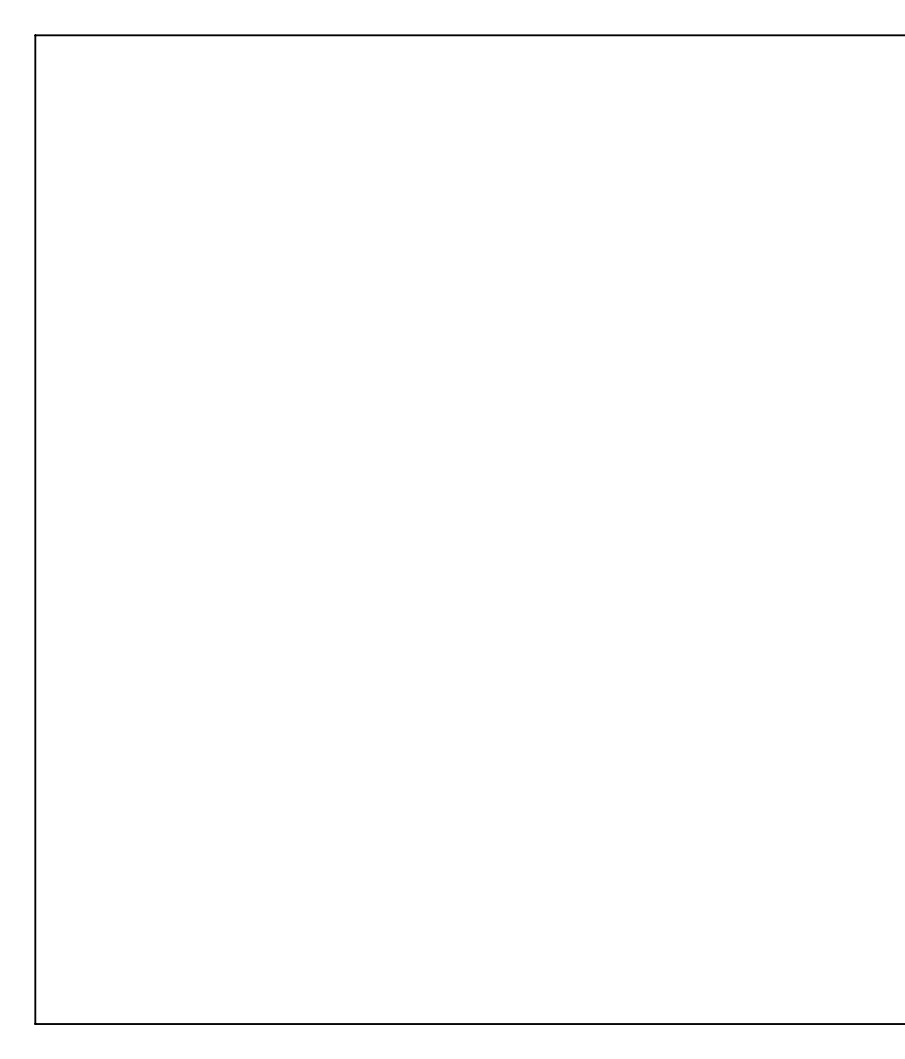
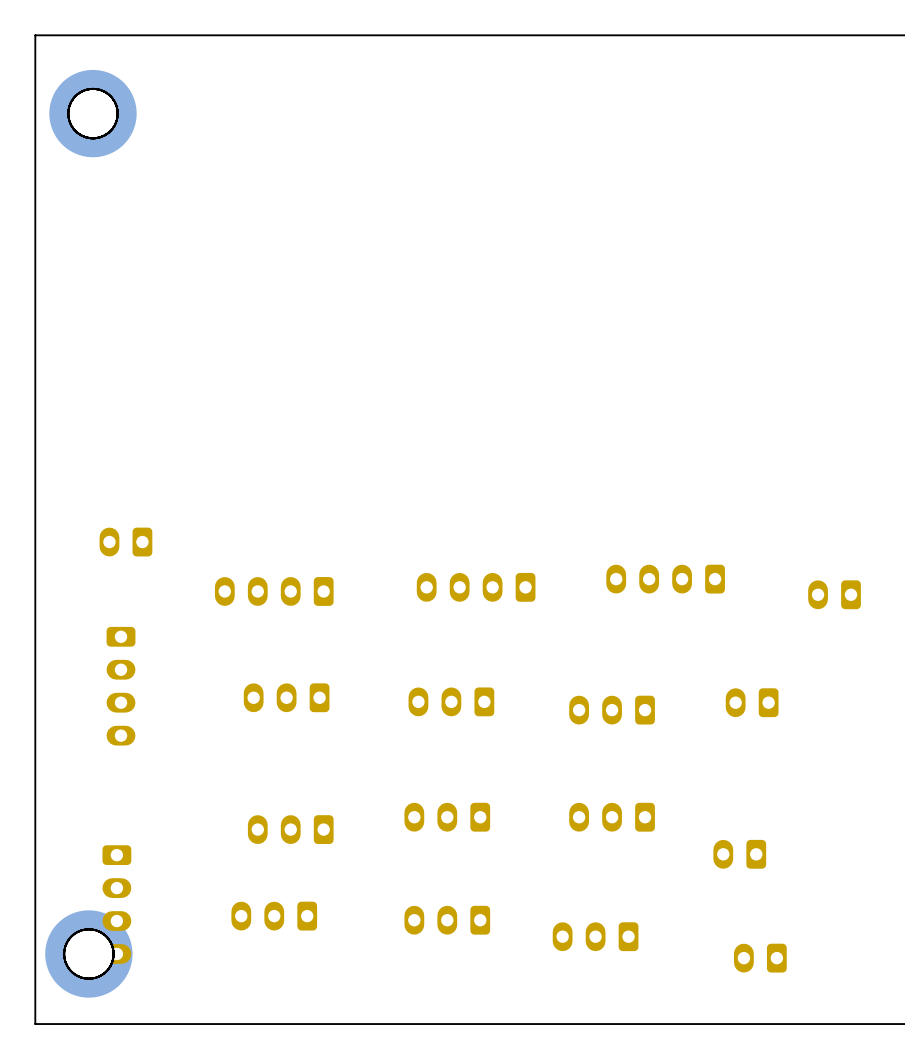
part: none -> (92, 113)
part: none -> (92, 113)
part: none -> (125, 542)
part: none -> (665, 579)
part: none -> (476, 587)
part: none -> (274, 591)
part: none -> (834, 594)
part: none -> (121, 686)
part: none -> (286, 697)
part: none -> (451, 701)
part: none -> (752, 702)
part: none -> (612, 710)
part: none -> (447, 817)
part: none -> (612, 817)
part: none -> (290, 829)
part: none -> (739, 854)
part: none -> (116, 904)
part: none -> (274, 916)
part: none -> (447, 920)
part: none -> (595, 936)
part: none -> (88, 954)
part: none -> (88, 954)
part: none -> (760, 958)

